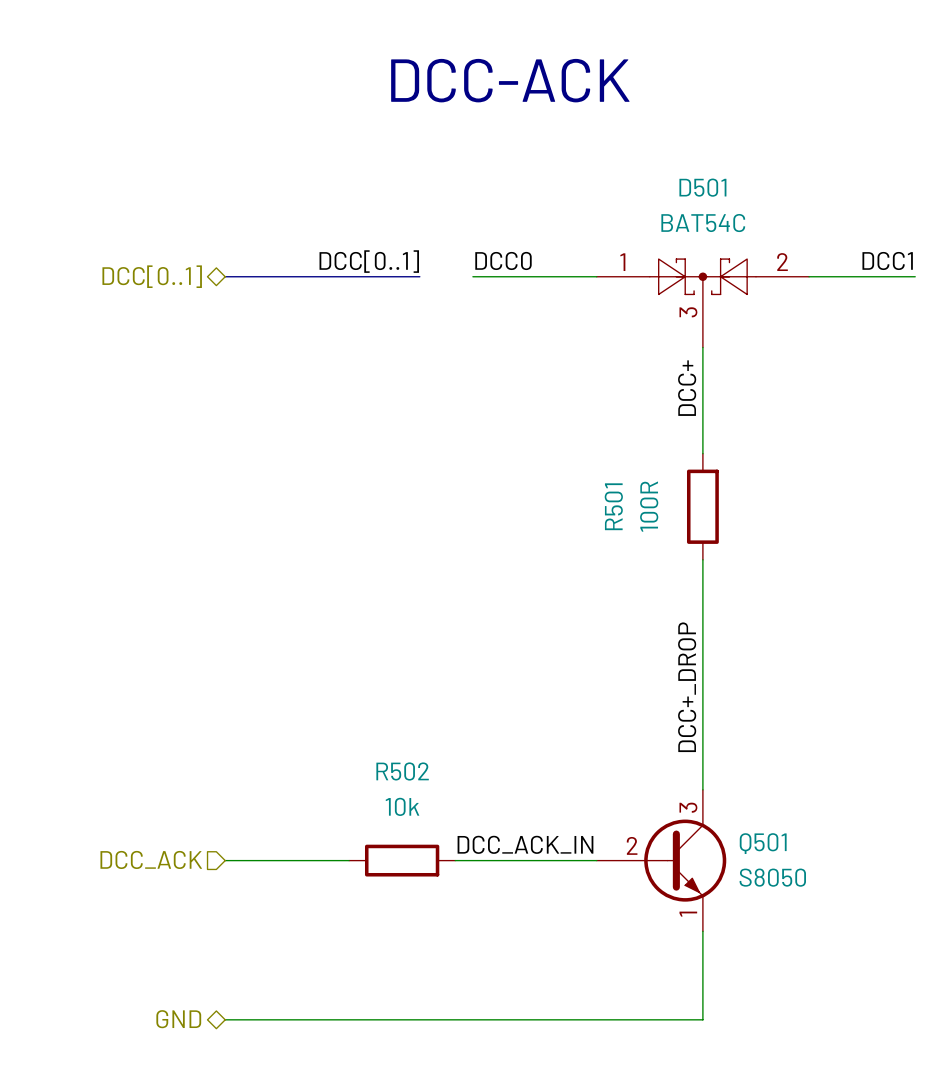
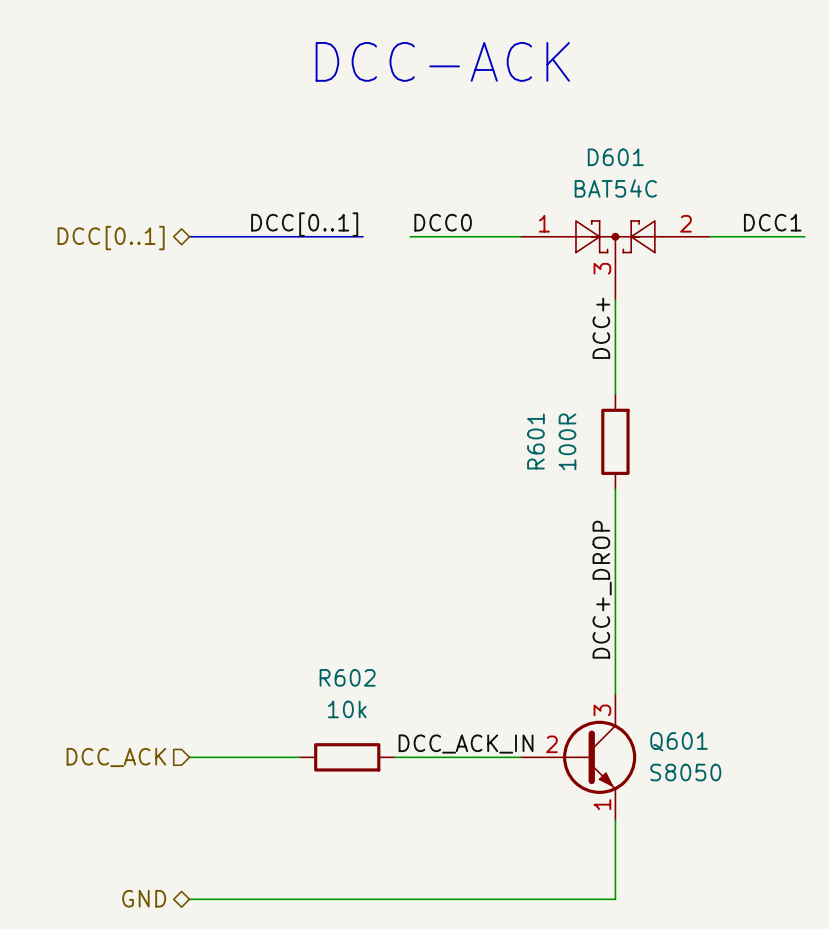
D501 name: D501 (702, 187) -> D601 (615, 157)
R501 name: R501 (613, 506) -> R601 (535, 441)
R502 name: R502 (402, 771) -> R602 (347, 677)
Q501 name: Q501 (763, 843) -> Q601 (679, 741)

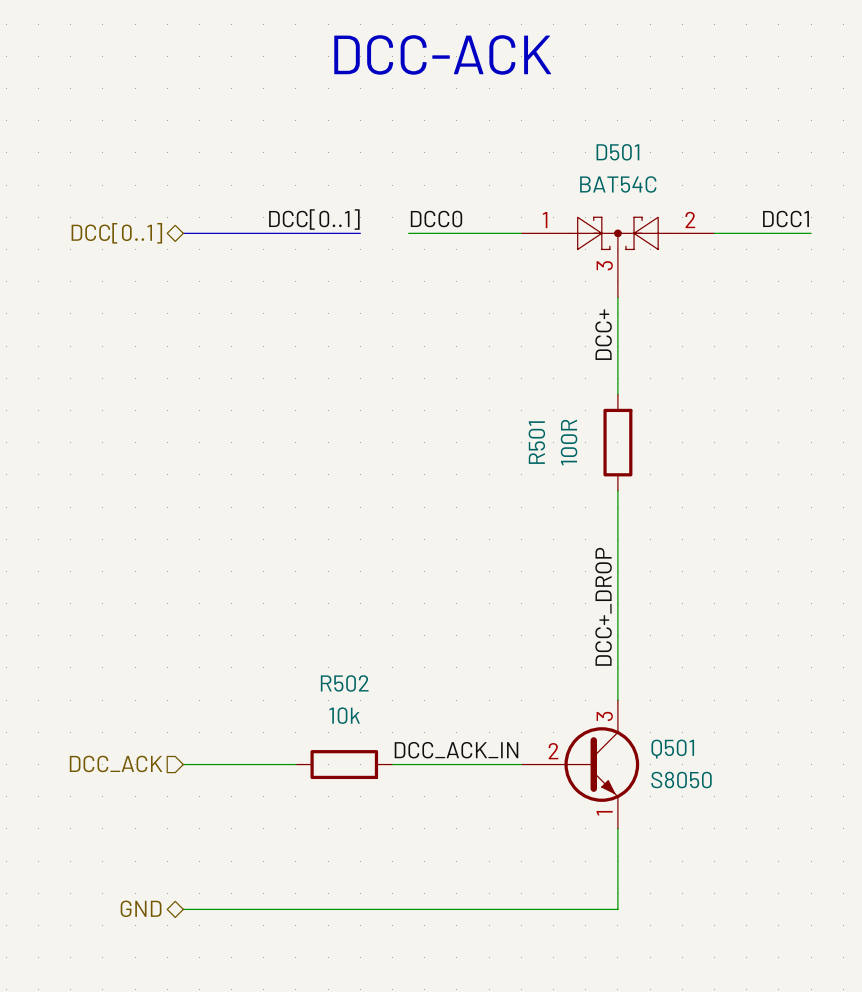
D601 name: D601 (615, 157) -> D501 (617, 152)
R601 name: R601 (535, 441) -> R501 (536, 442)
R602 name: R602 (347, 677) -> R502 (344, 683)
Q601 name: Q601 (679, 741) -> Q501 (672, 749)

